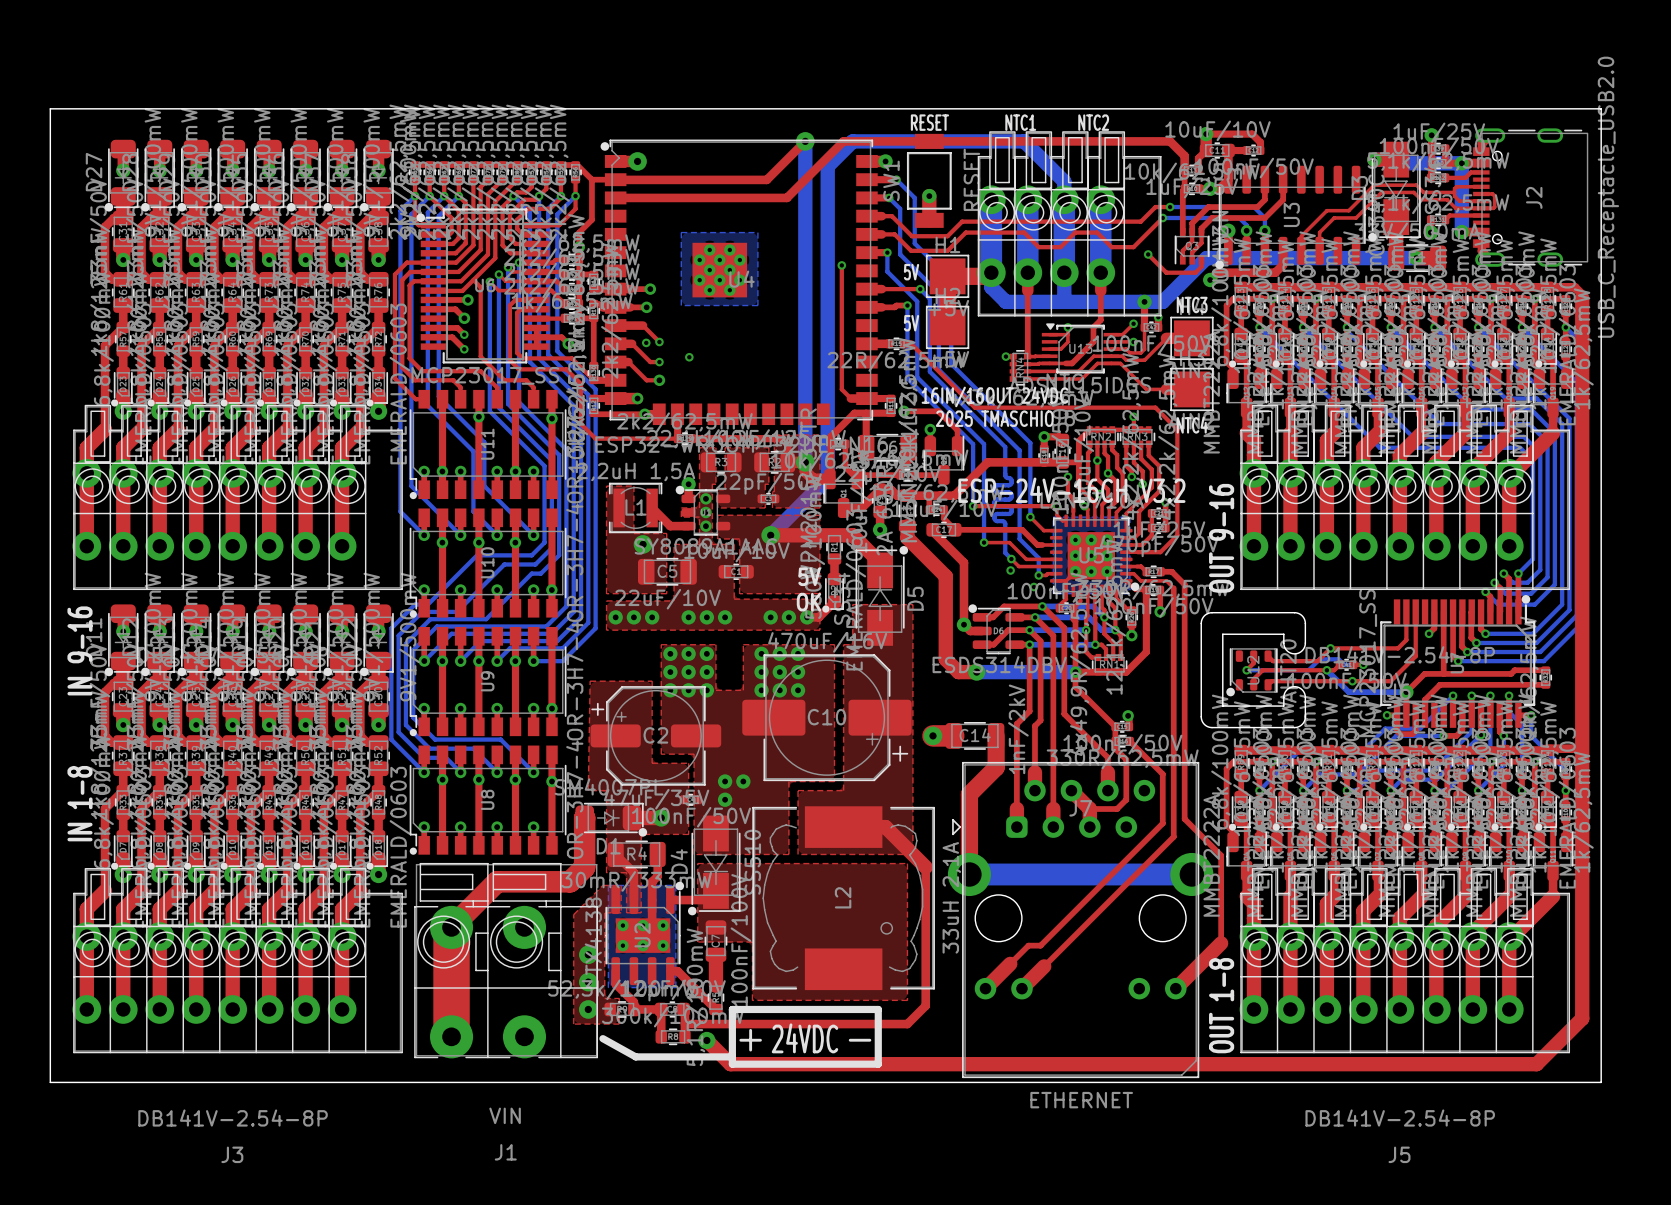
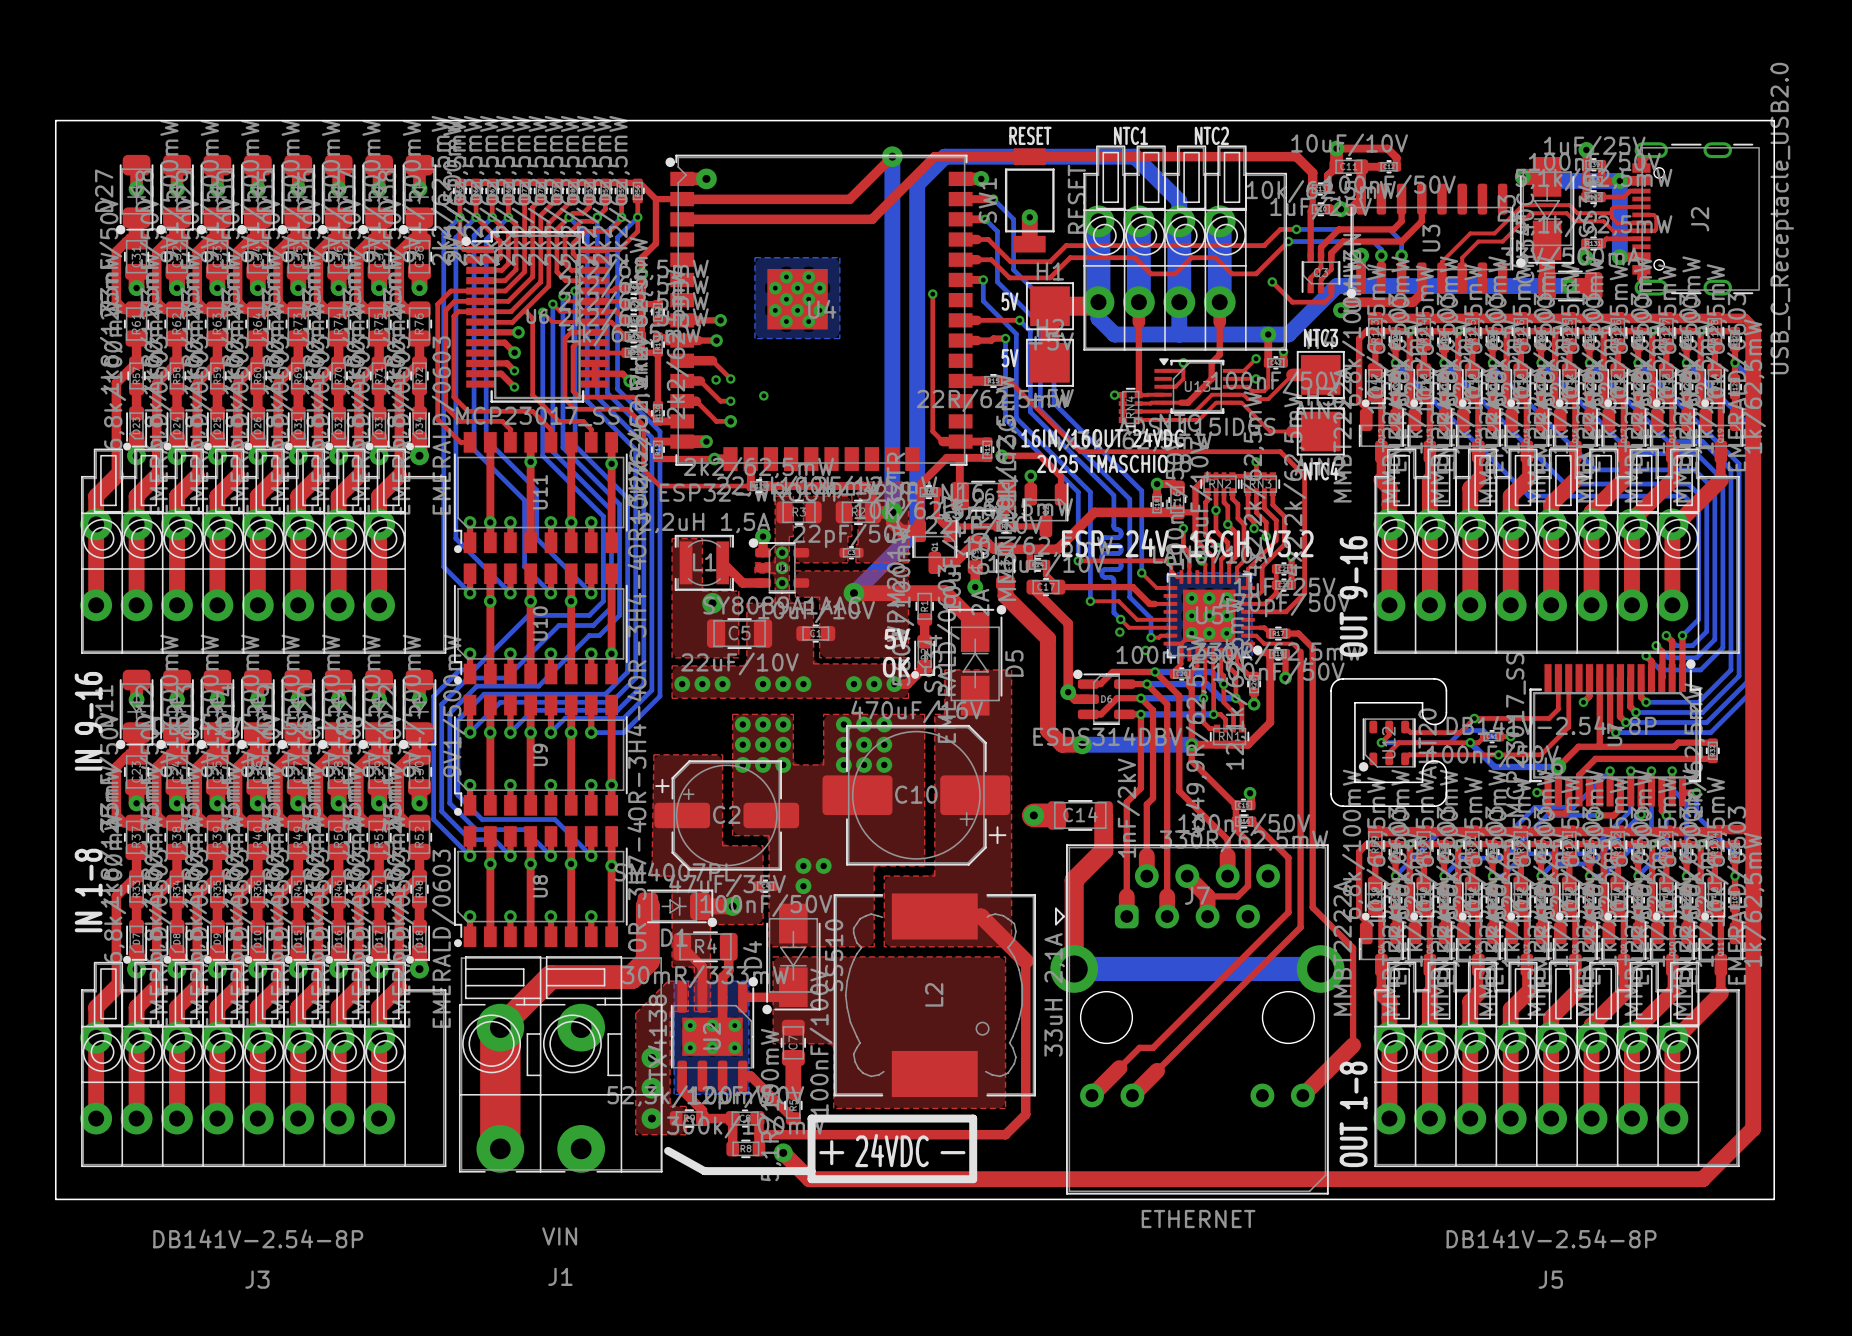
U10 value: OR-3H7-4 (574, 562) -> OR-3H4-4 (636, 623)
U9 value: OR-3H7-4 (574, 681) -> OR-3H4-4 (636, 754)

